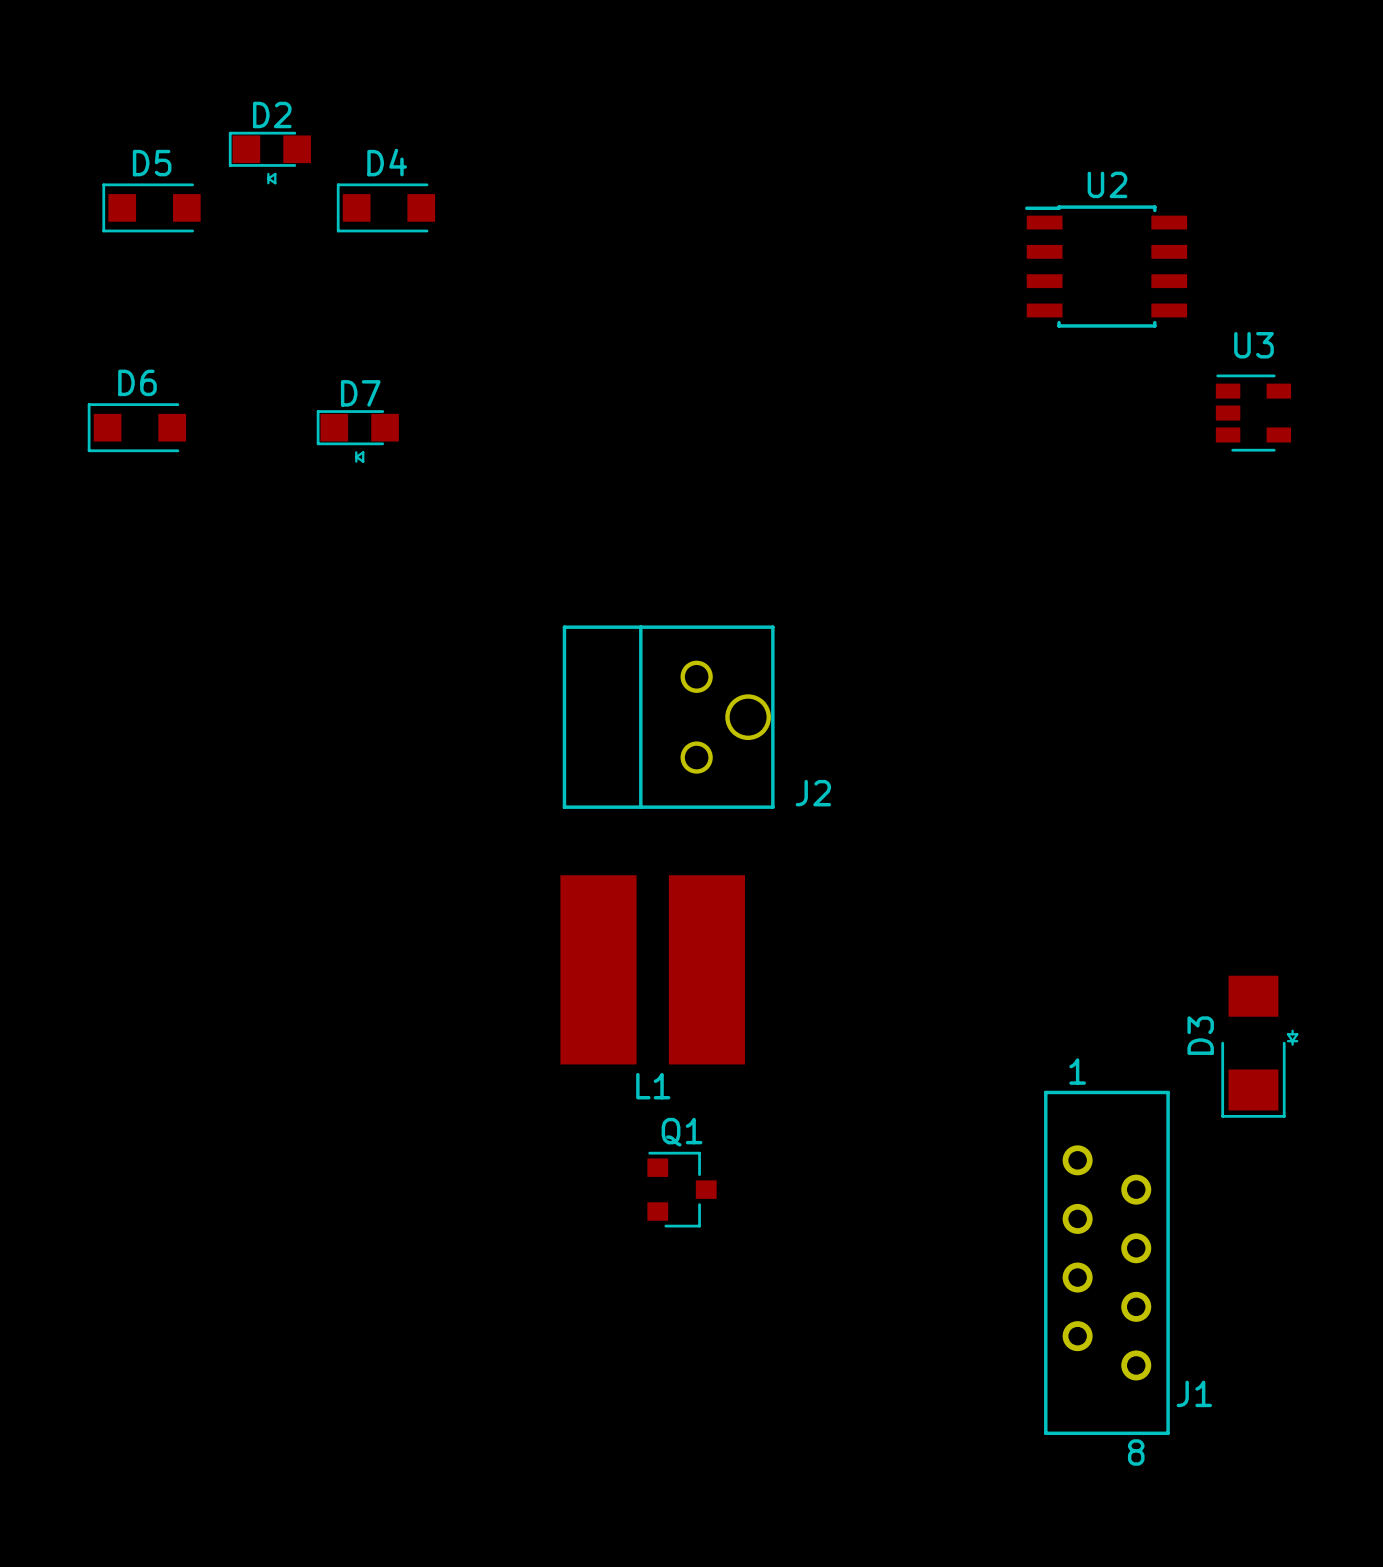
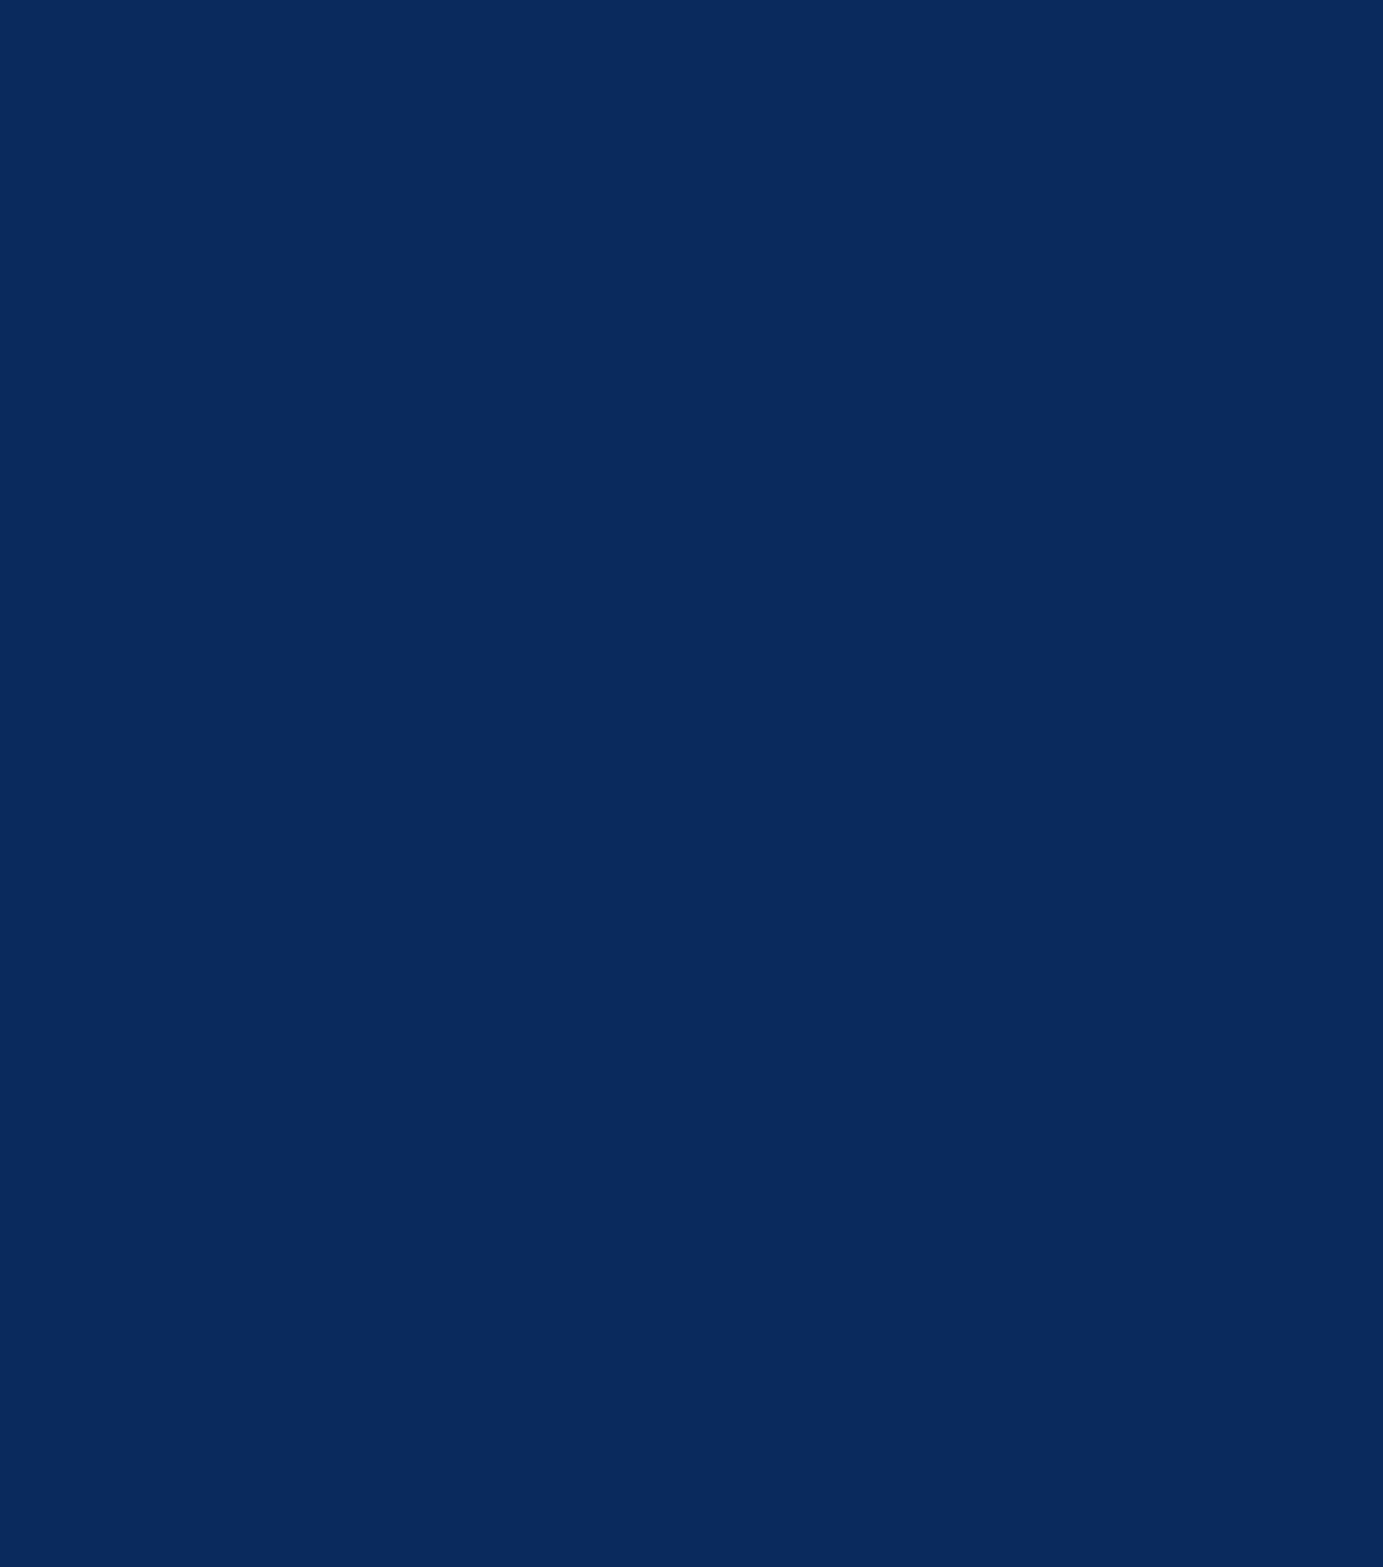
D2: (269, 158) -> none
D5: (151, 207) -> none
D4: (385, 207) -> none
U2: (1106, 266) -> none
U3: (1253, 413) -> none
D6: (136, 427) -> none
D7: (357, 436) -> none
J2: (668, 717) -> none
L1: (652, 969) -> none
D3: (1259, 1046) -> none
Q1: (682, 1189) -> none
J1: (1106, 1262) -> none

